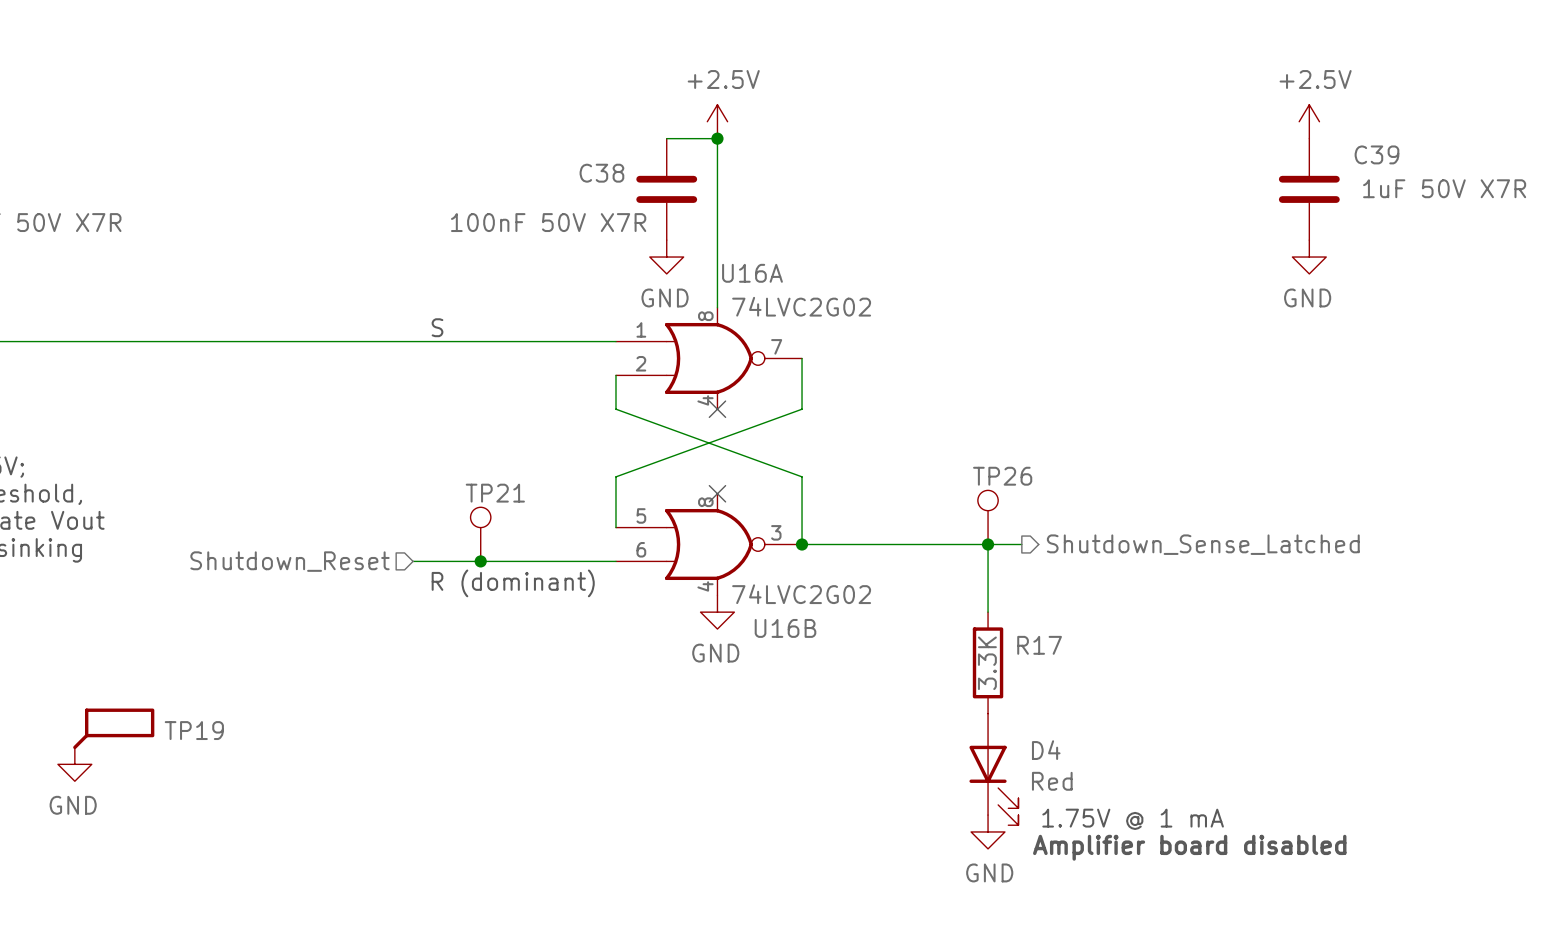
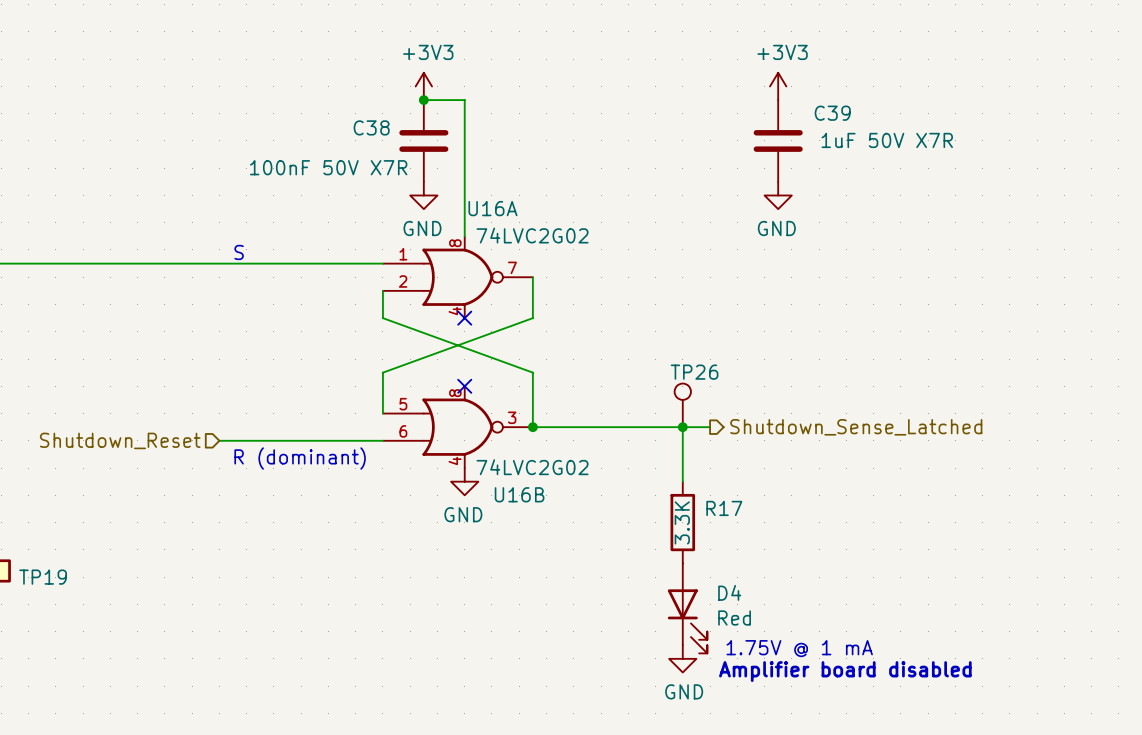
power symbol: none -> +3V3 (423, 86)
power symbol: +2.5V (717, 121) -> none
power symbol: none -> +3V3 (778, 86)
power symbol: +2.5V (1309, 121) -> none
junction position: (717, 138) -> (423, 100)
C39 position: (1309, 189) -> (778, 140)
power symbol position: GND (1309, 257) -> GND (778, 195)
TP21: (480, 534) -> none
junction: (480, 561) -> none

